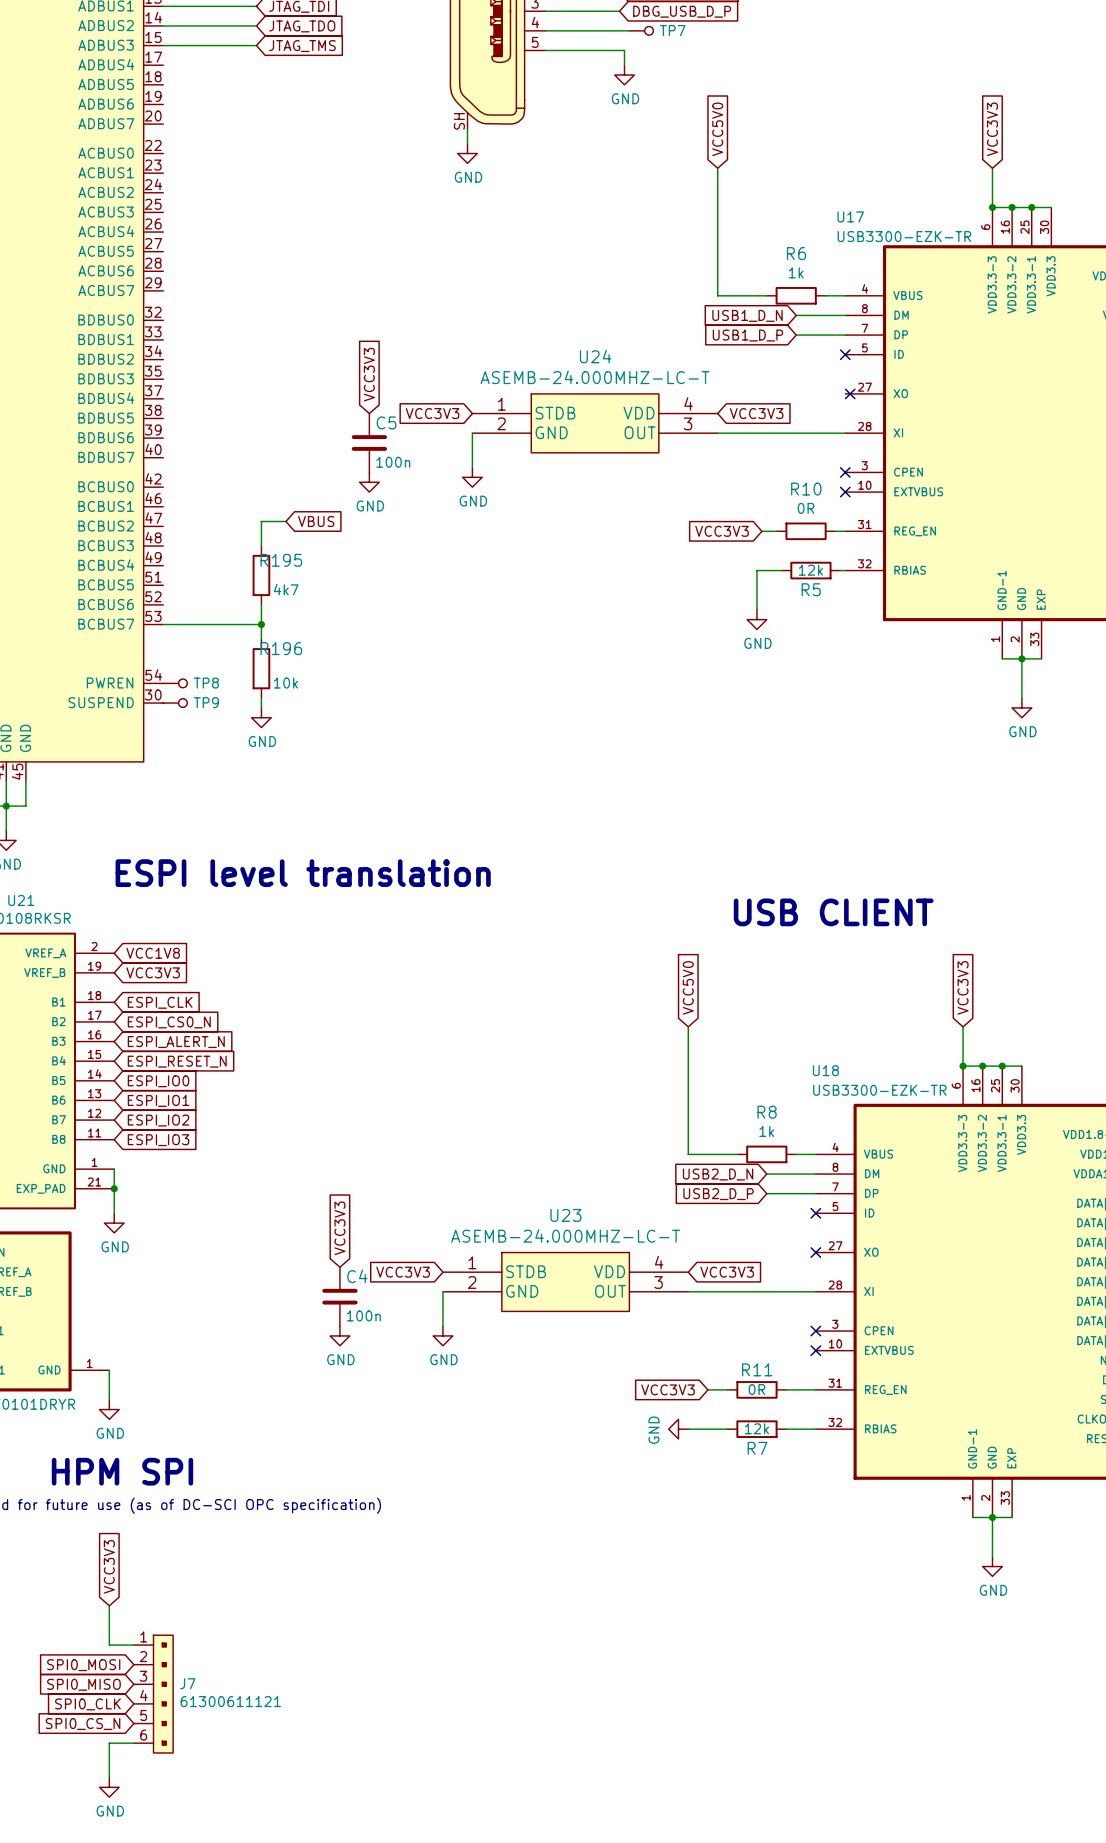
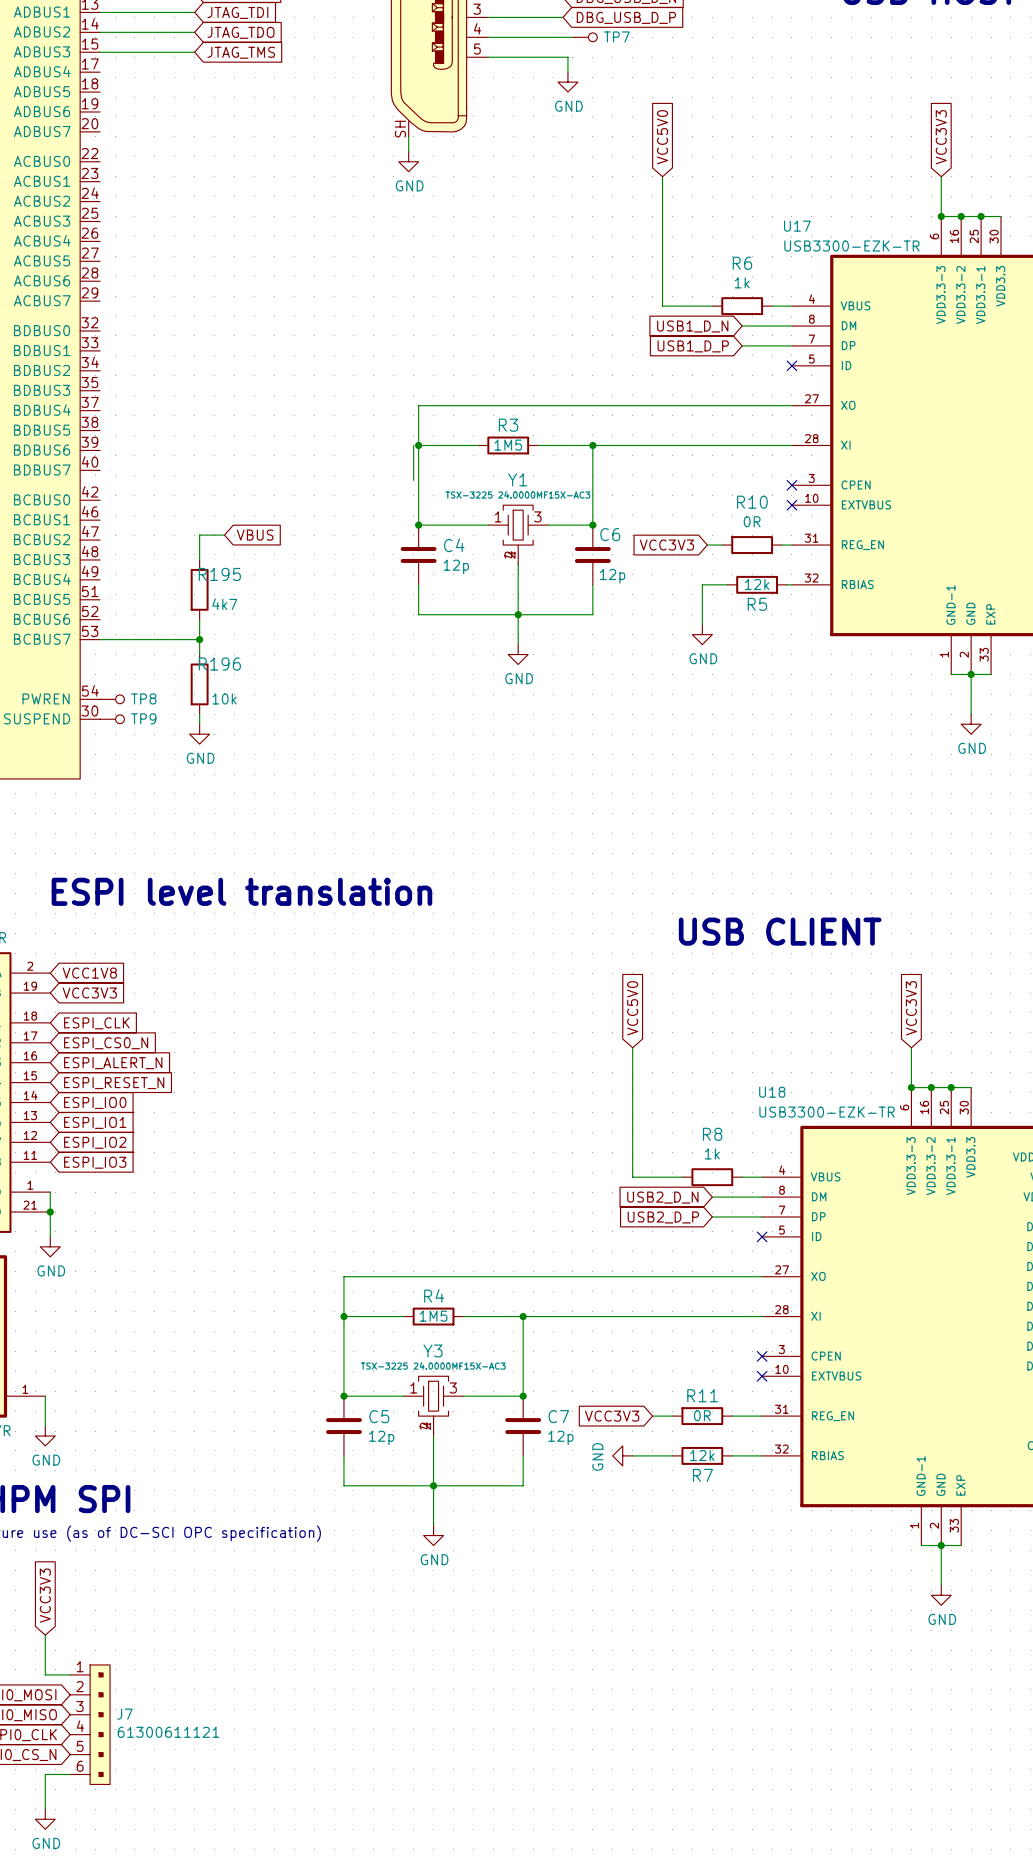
global label: VCC3V3 (369, 374) -> none
wire: none -> (791, 405) (418, 405) (418, 525) (488, 525)
no-connect mark: (850, 393) -> none
global label: VCC3V3 (432, 413) -> none
global label: VCC3V3 (756, 413) -> none
C5 name position: C5 (386, 422) -> C5 (379, 1416)
U24: ASEMB-24.000MHZ-LC-T (595, 423) -> none
junction: none -> (418, 445)
R3: none -> (508, 445)
wire: none -> (592, 445) (592, 525) (548, 525)
junction: none -> (592, 445)
C5 position: (369, 442) -> (343, 1426)
C5 text: 100n (393, 462) -> 12p (381, 1437)
power symbol: GND (472, 477) -> none
power symbol: GND (369, 482) -> none
junction: none -> (418, 525)
junction: none -> (592, 525)
Y1: none -> (518, 535)
C6: none -> (592, 554)
wire: none -> (518, 564) (518, 644)
wire: none -> (418, 584) (418, 614) (592, 614) (592, 584)
junction: none -> (518, 614)
power symbol: none -> GND (518, 654)
global label: VCC3V3 (339, 1228) -> none
wire: none -> (762, 1276) (343, 1276) (343, 1396) (403, 1396)
no-connect mark: (815, 1252) -> none
global label: VCC3V3 (403, 1272) -> none
global label: VCC3V3 (727, 1272) -> none
C4 name position: C4 (357, 1276) -> C4 (454, 545)
U23: ASEMB-24.000MHZ-LC-T (565, 1281) -> none
wire: none -> (343, 1316) (403, 1316)
junction: none -> (343, 1316)
wire: (442, 1291) (442, 1326) -> none
R4: none -> (433, 1316)
wire: none -> (523, 1316) (523, 1396) (463, 1396)
junction: none -> (523, 1316)
C4 position: (339, 1296) -> (418, 554)
C4 text: 100n (363, 1315) -> 12p (456, 566)
power symbol: GND (339, 1335) -> none
power symbol: GND (442, 1335) -> none
junction: none -> (343, 1396)
junction: none -> (523, 1396)
Y3: none -> (433, 1406)
C7: none -> (523, 1426)
wire: none -> (433, 1436) (433, 1525)
wire: none -> (343, 1455) (343, 1485) (523, 1485) (523, 1455)
junction: none -> (433, 1485)
power symbol: none -> GND (433, 1535)

